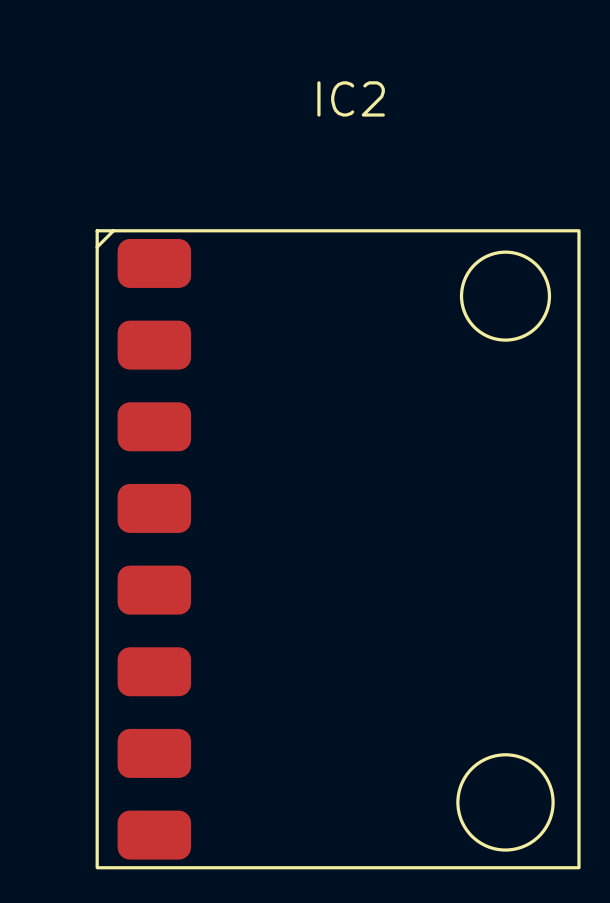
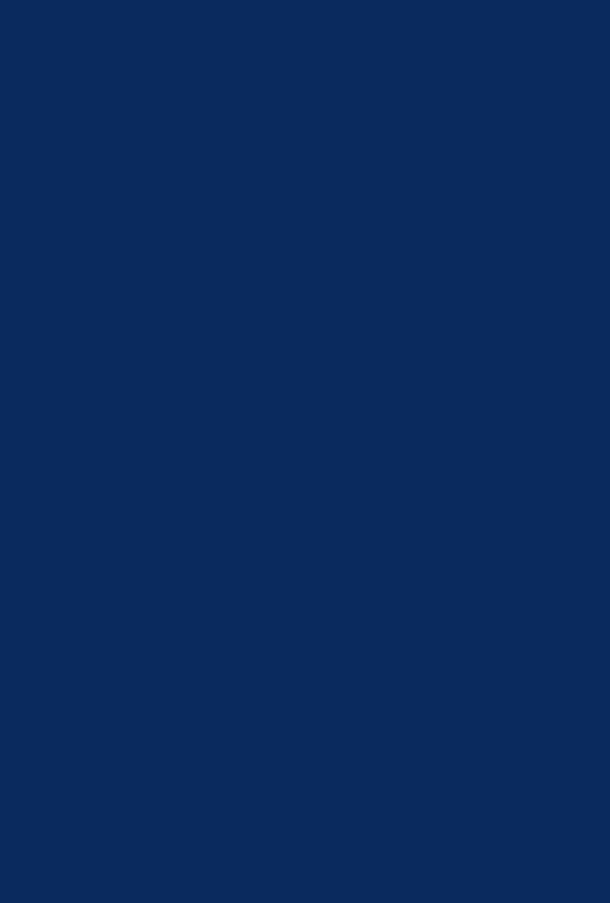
IC2: (338, 549) -> none

